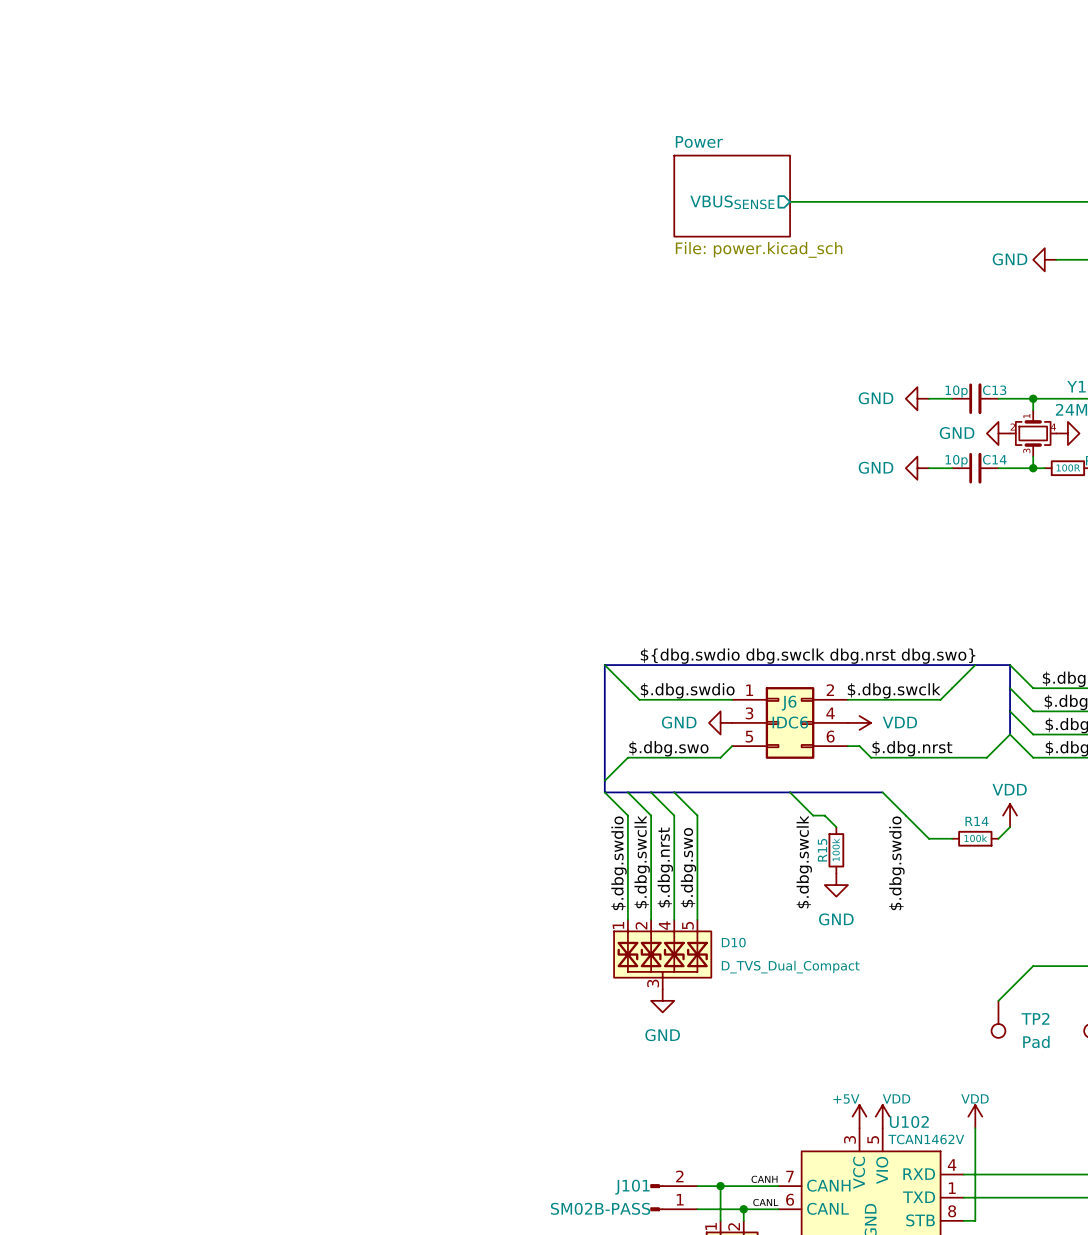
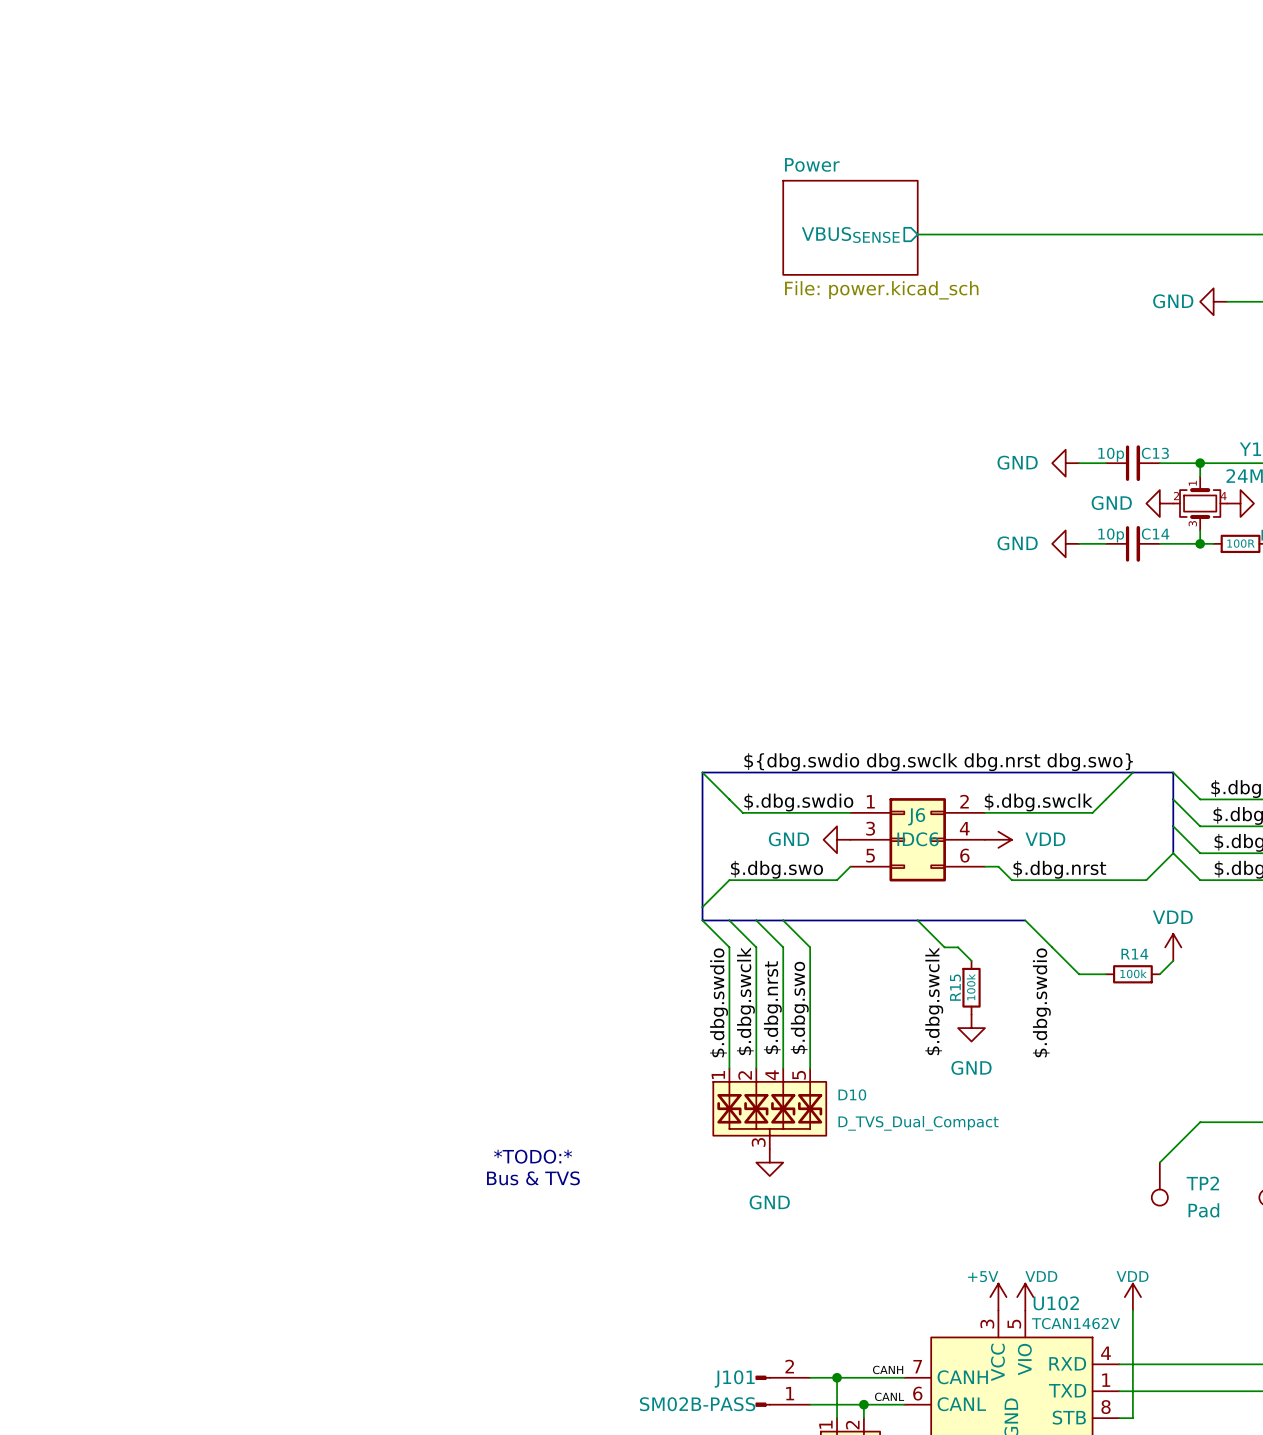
text: none -> *TODO:* (533, 1156)
text: none -> Bus & TVS (533, 1178)

